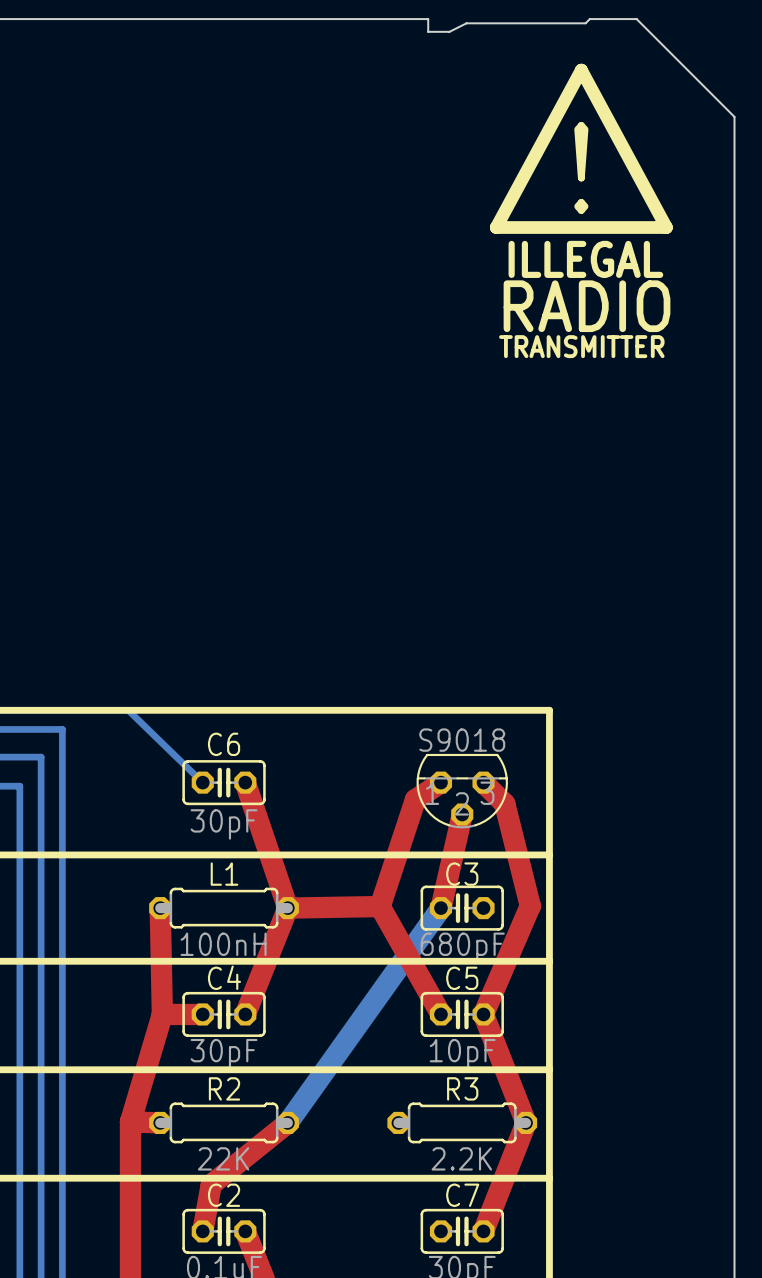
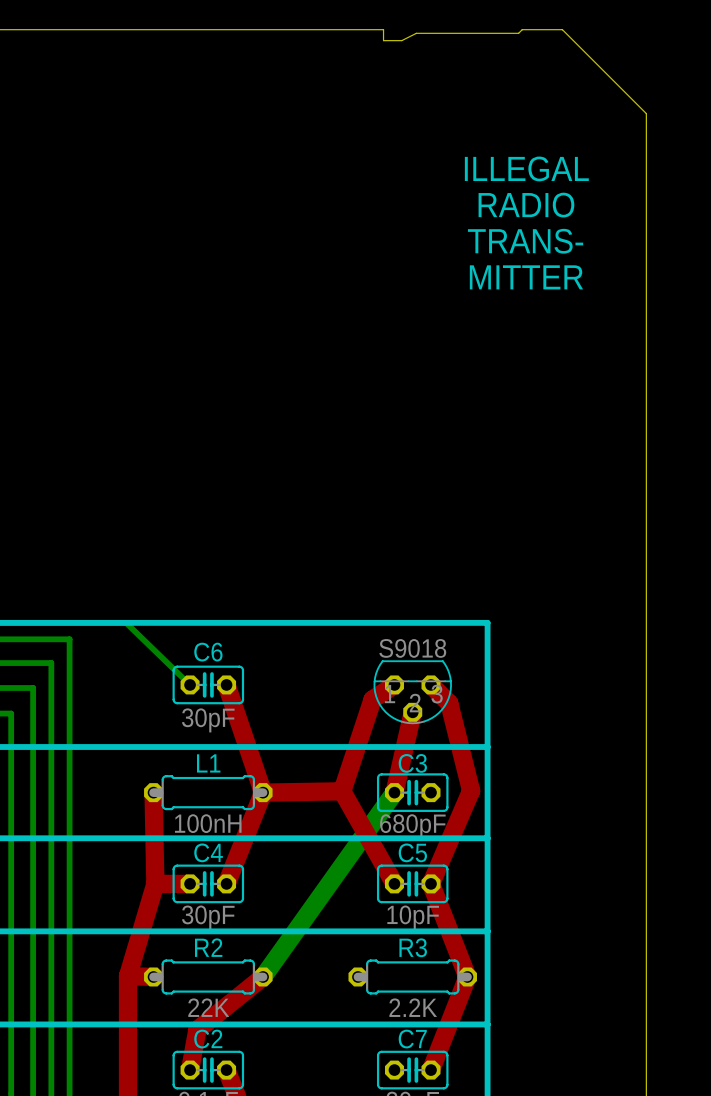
line: (581, 70) (666, 227) (496, 227) (581, 70) -> none
text: ! (581, 167) -> none
text: none -> ILLEGAL (526, 168)
text: none -> RADIO (526, 205)
text: ILLEGAL (585, 259) -> TRANS- (525, 241)
text: RADIO (587, 306) -> MITTER (526, 277)
text: TRANSMITTER (581, 346) -> none

